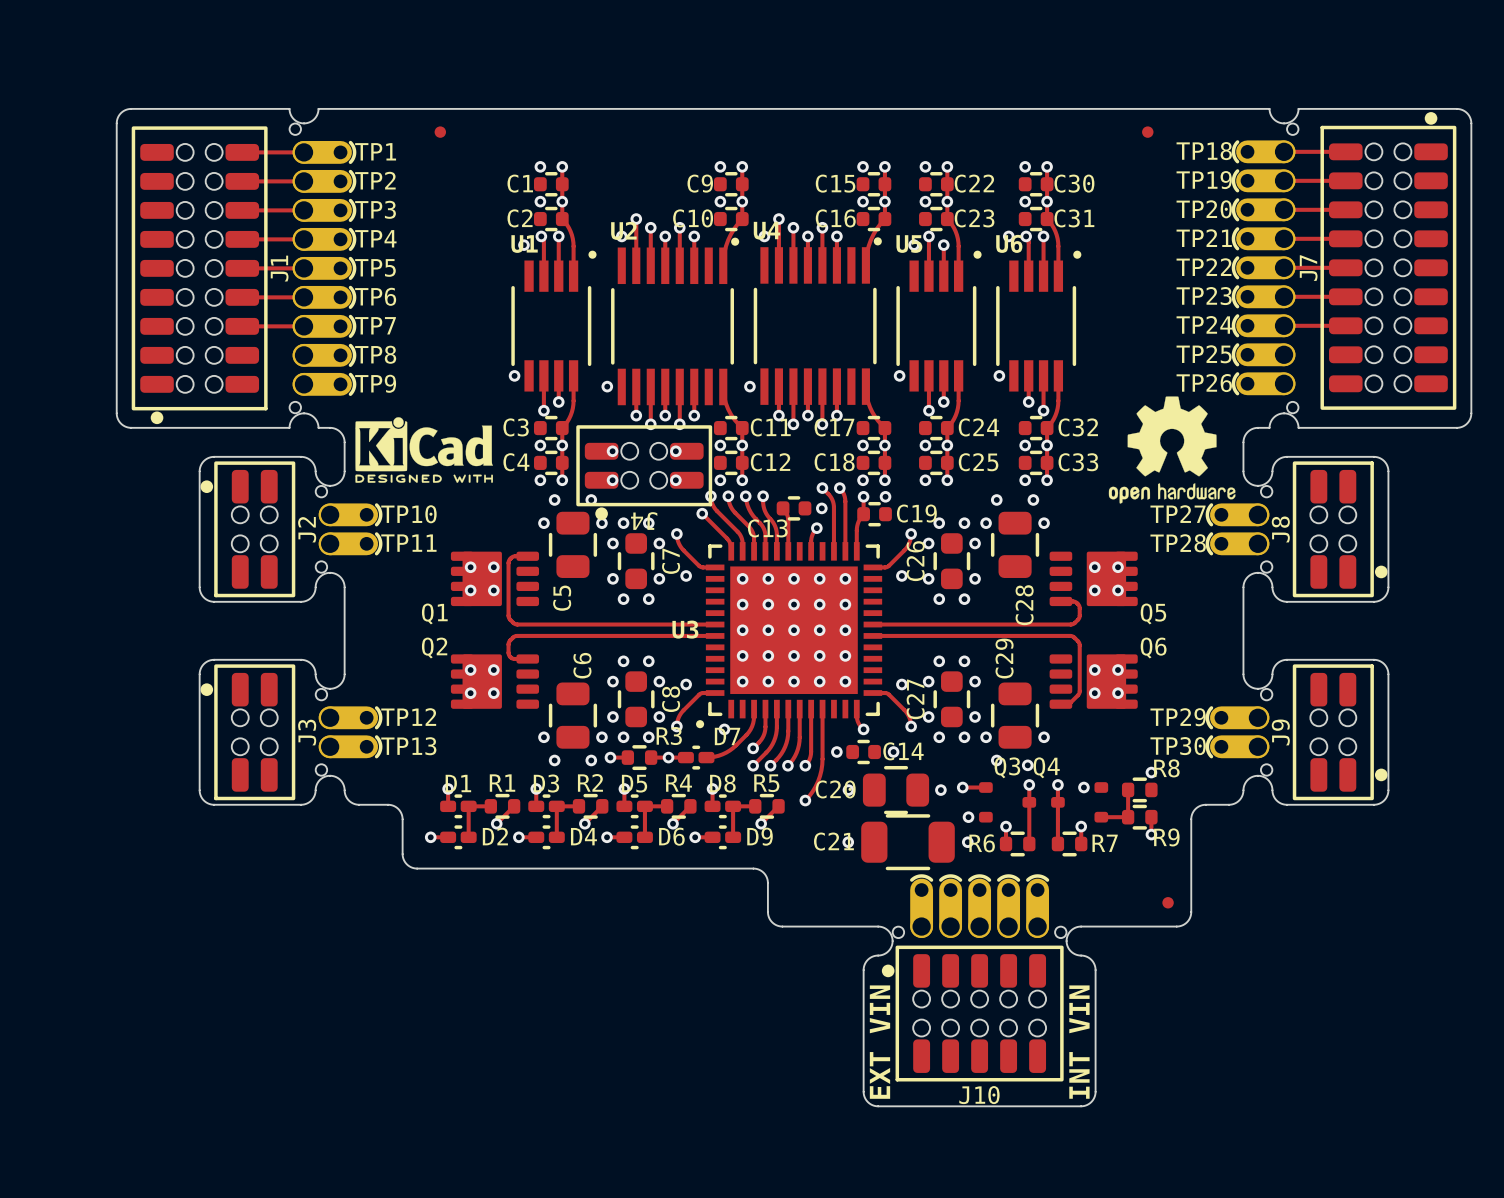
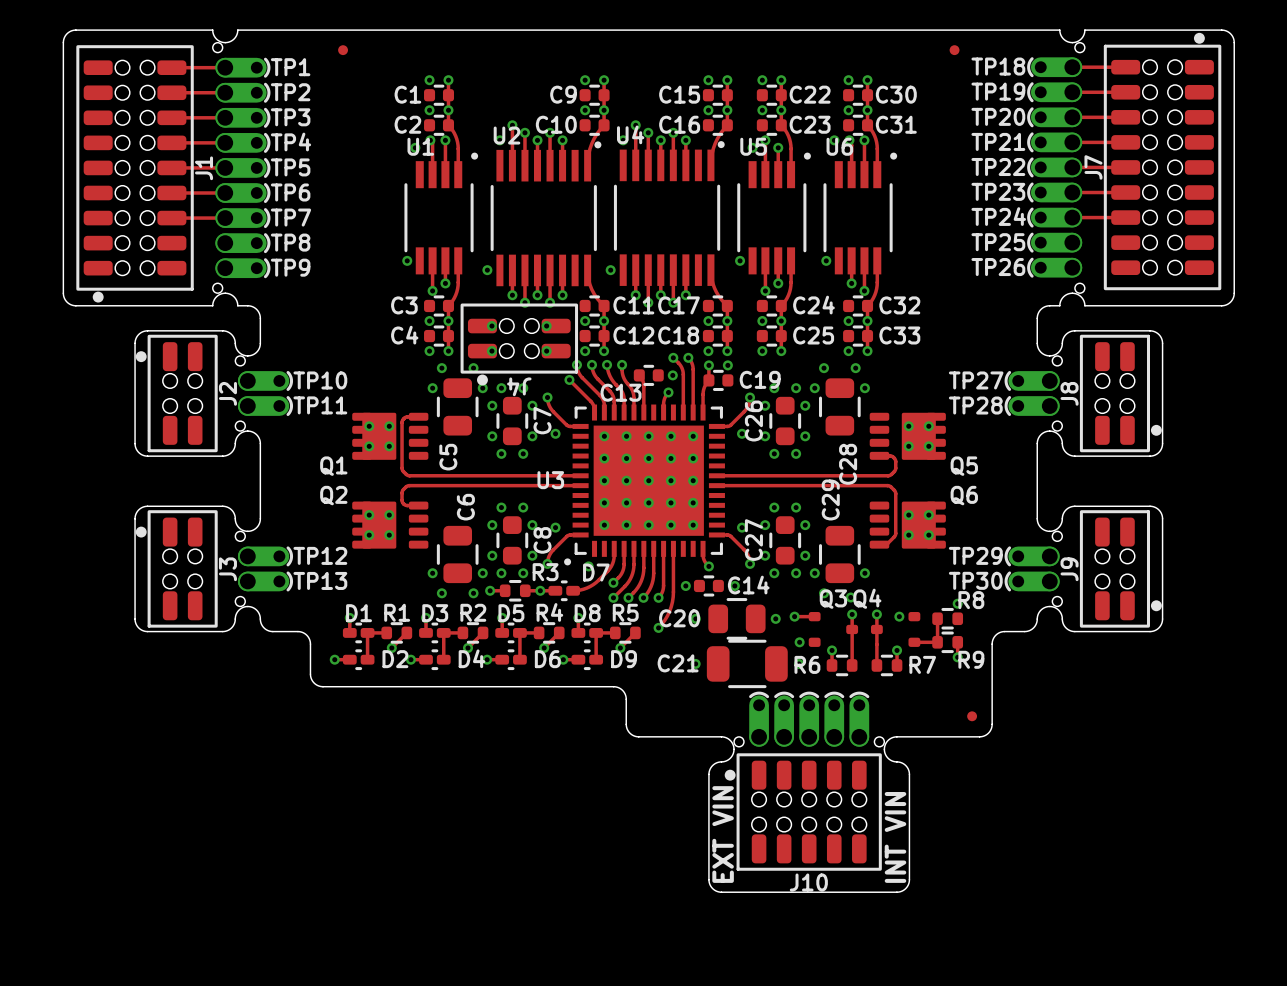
drawing: [1108, 396, 1236, 504] -> none
drawing: [355, 417, 493, 483] -> none

